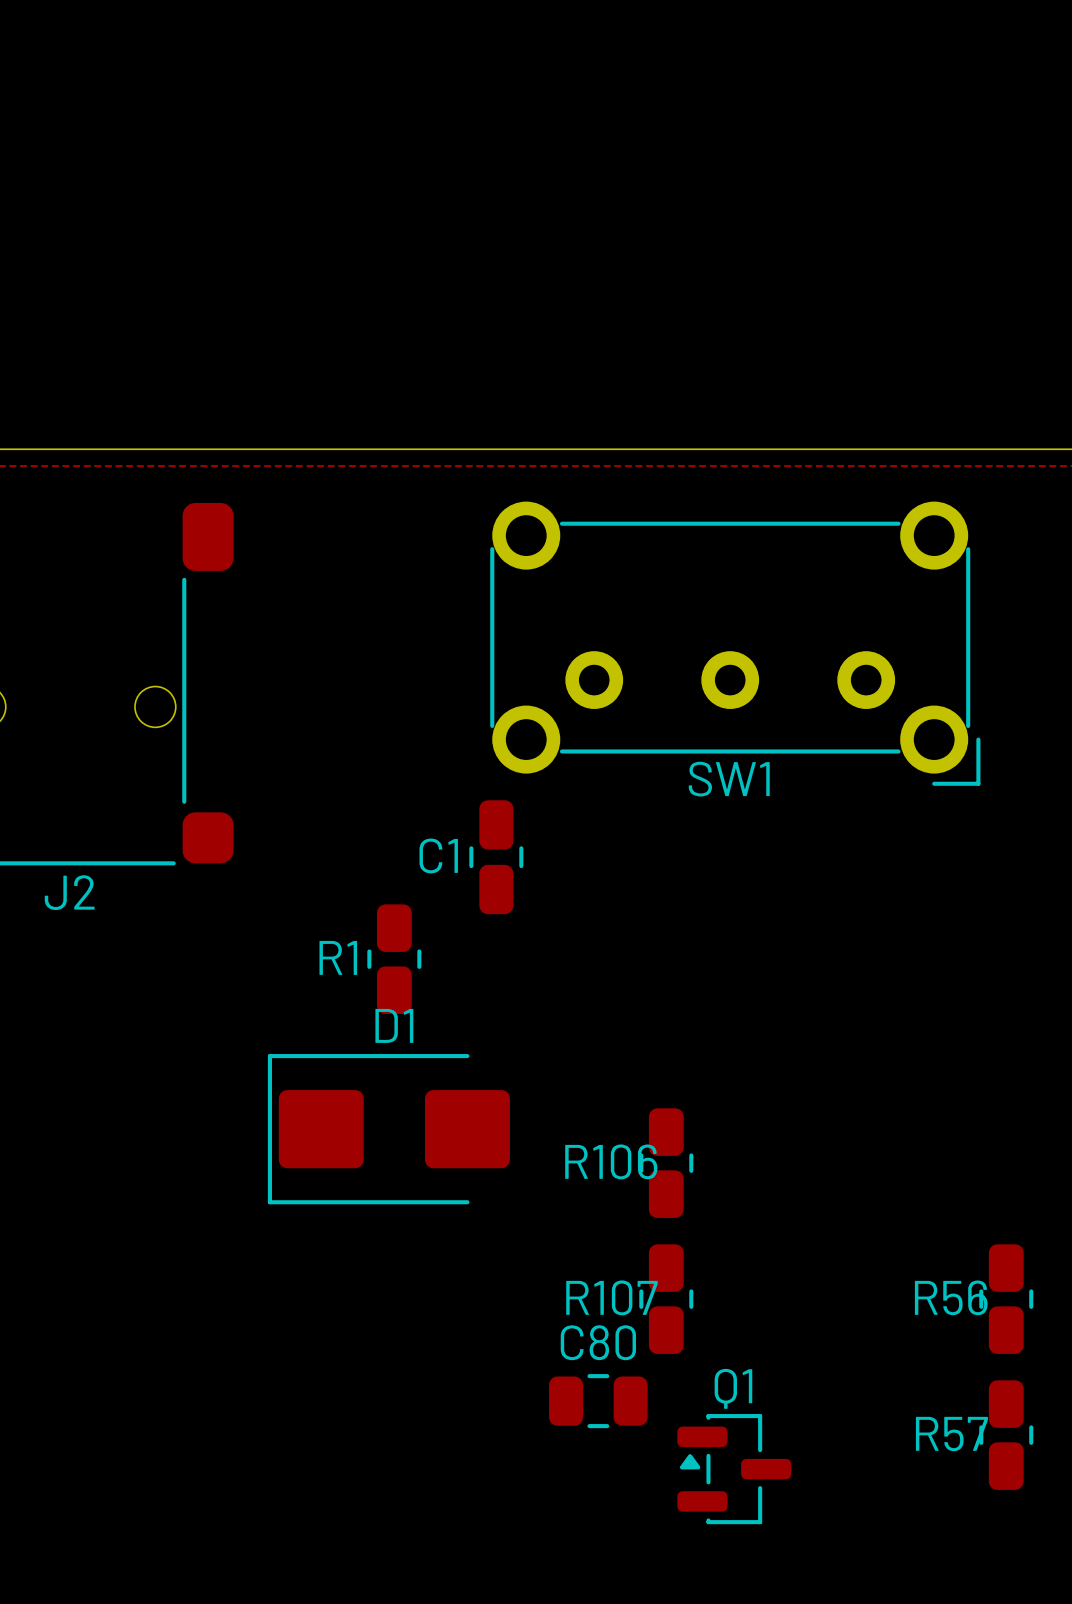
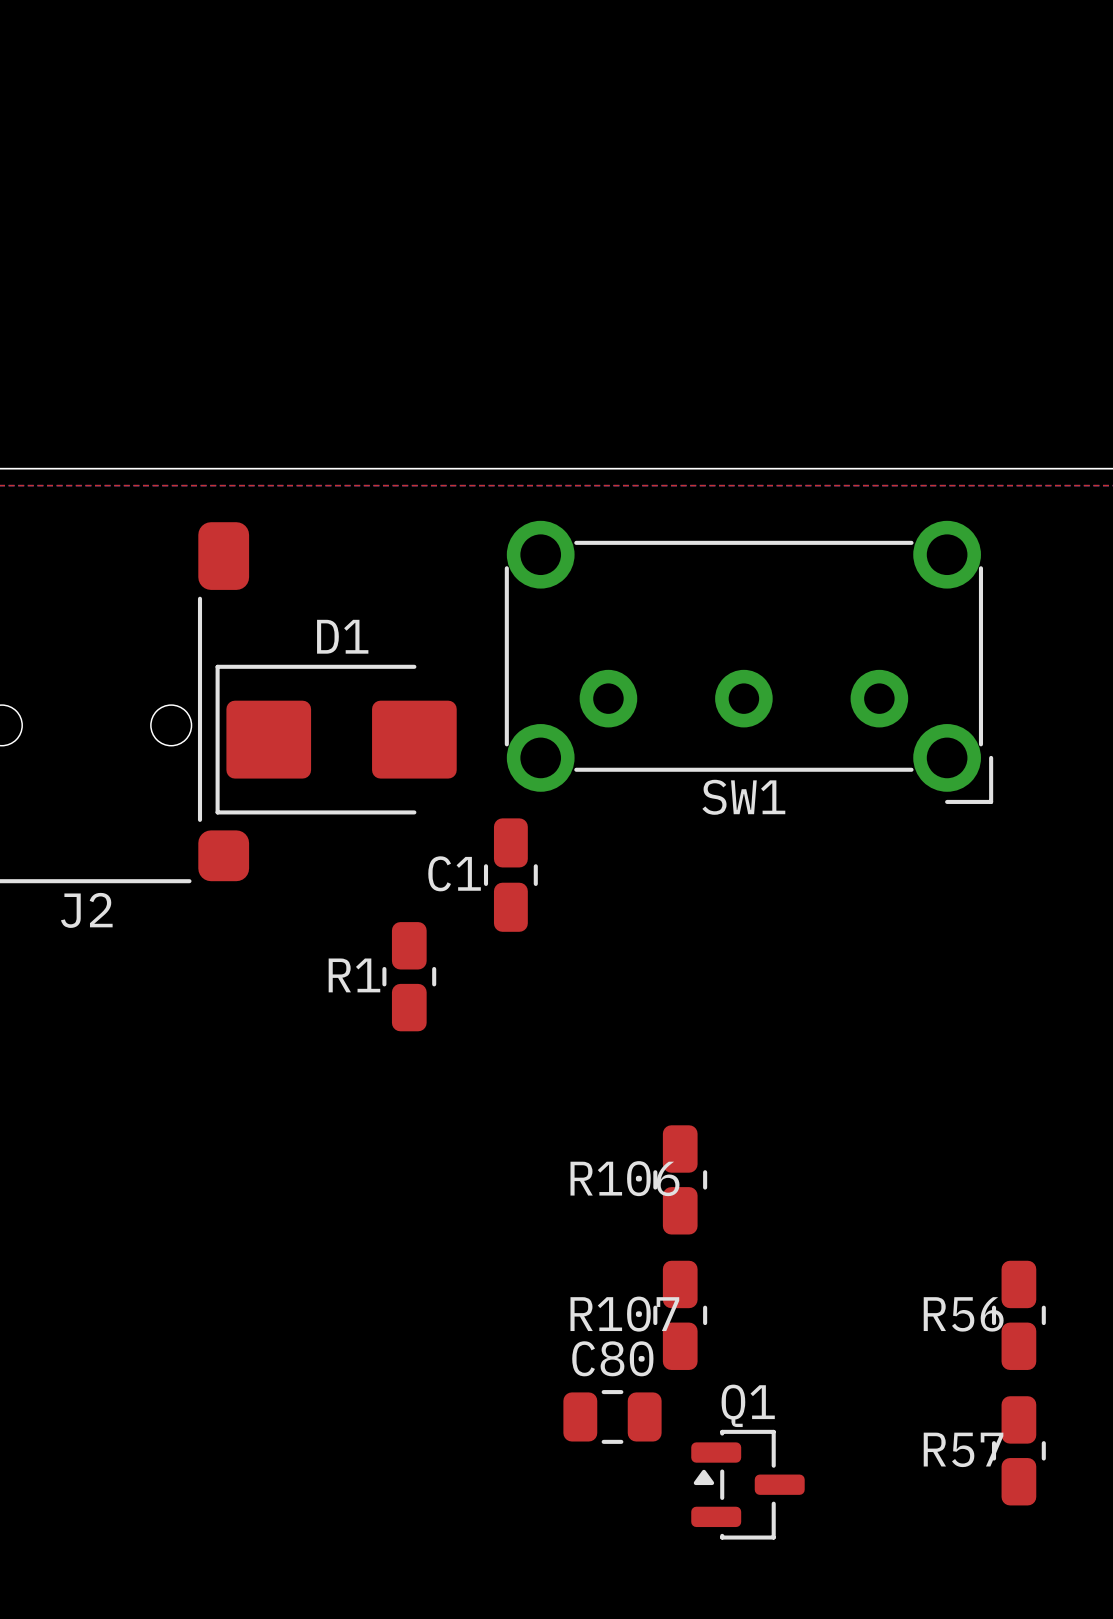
D1 position: (388, 1129) -> (336, 739)

